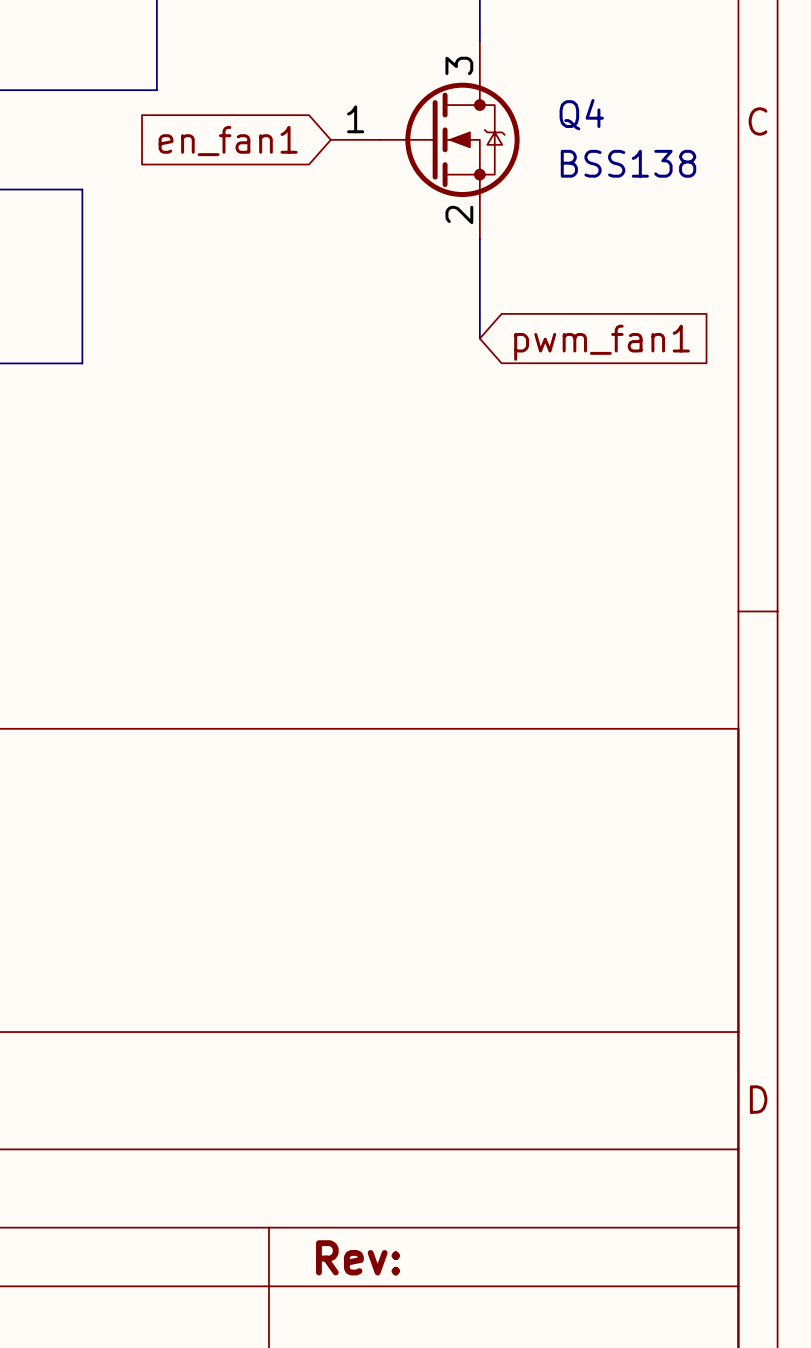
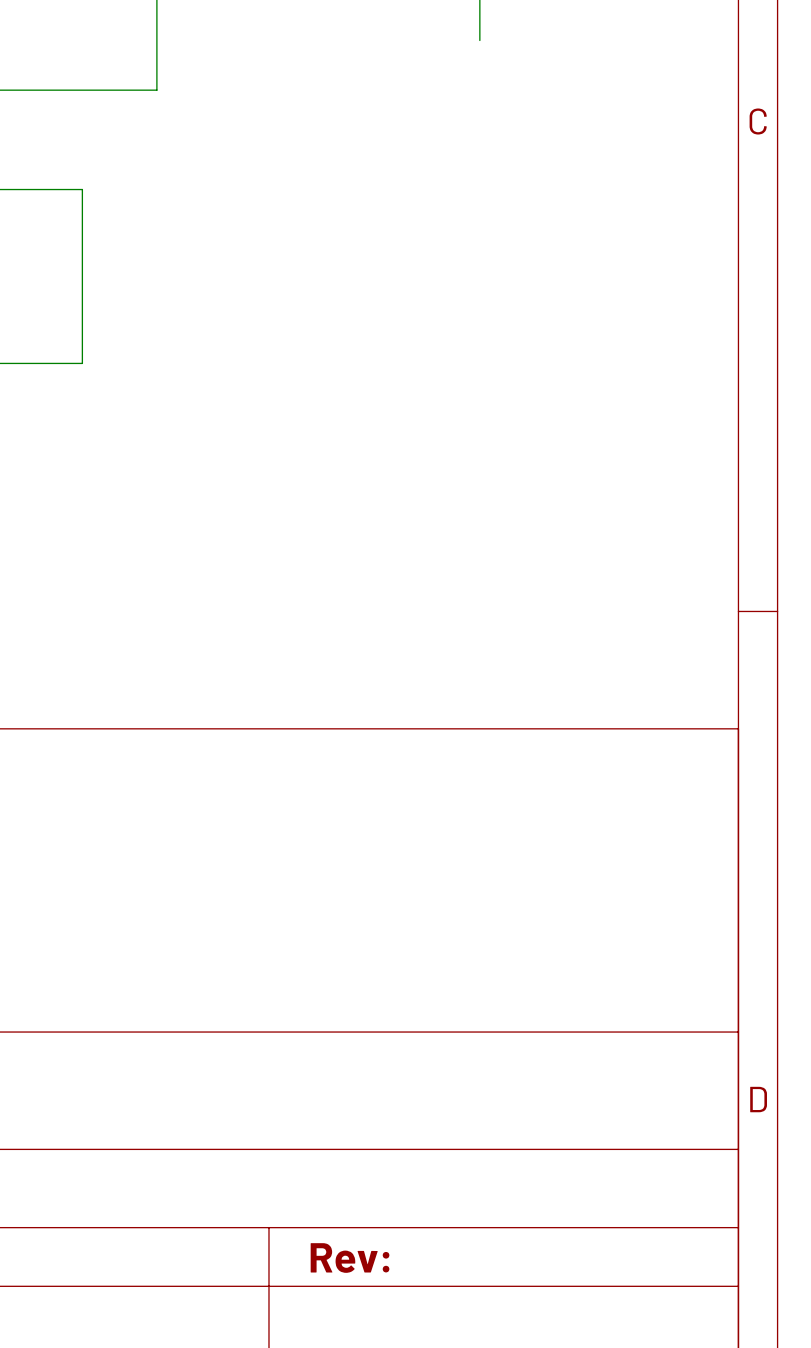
Q4: BSS138 (425, 139) -> none
global label: en_fan1 (228, 141) -> none
wire: (479, 239) (479, 338) -> none
global label: pwm_fan1 (602, 342) -> none

